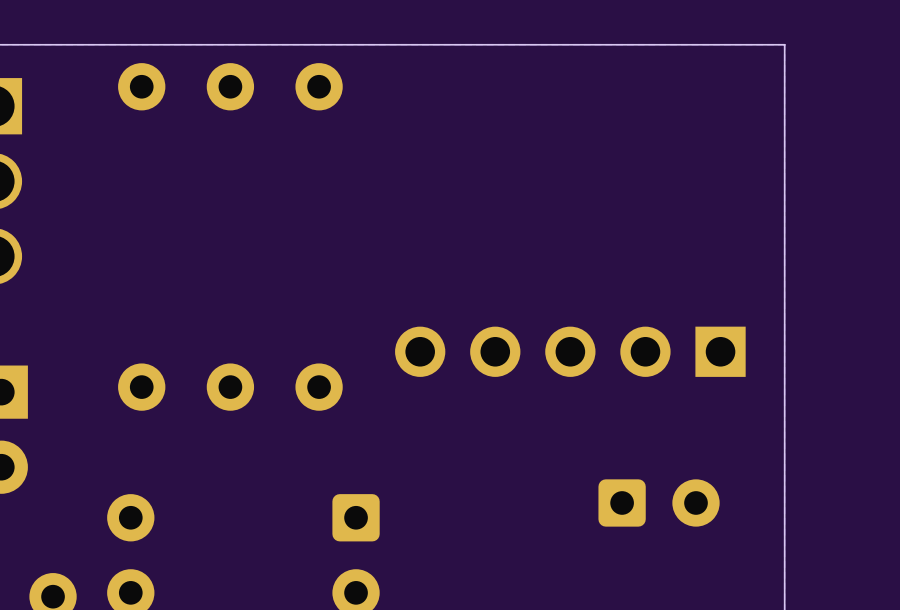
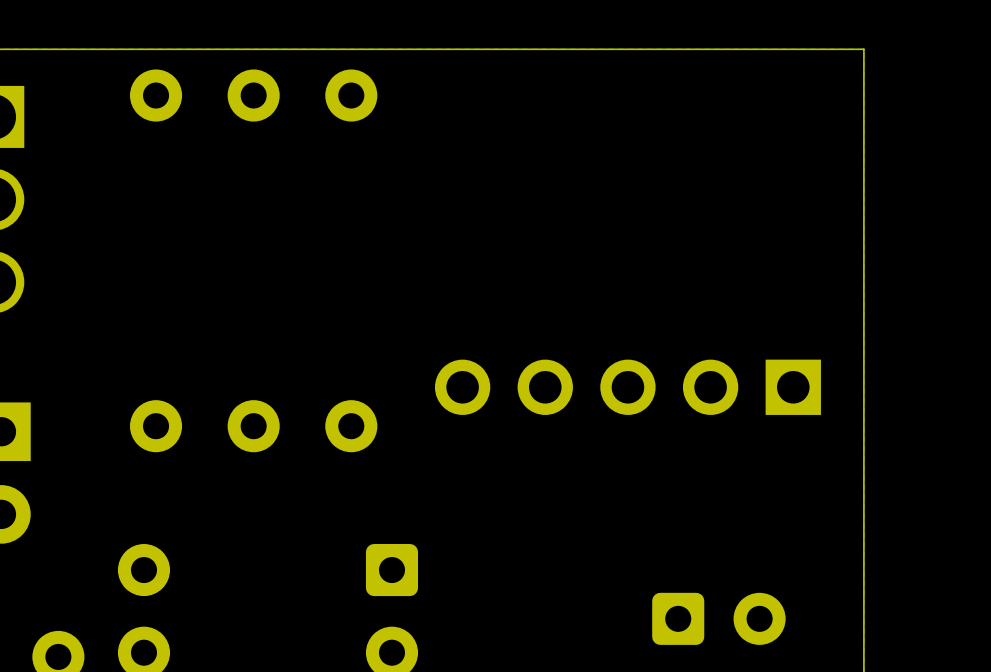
part position: (659, 502) -> (718, 618)

